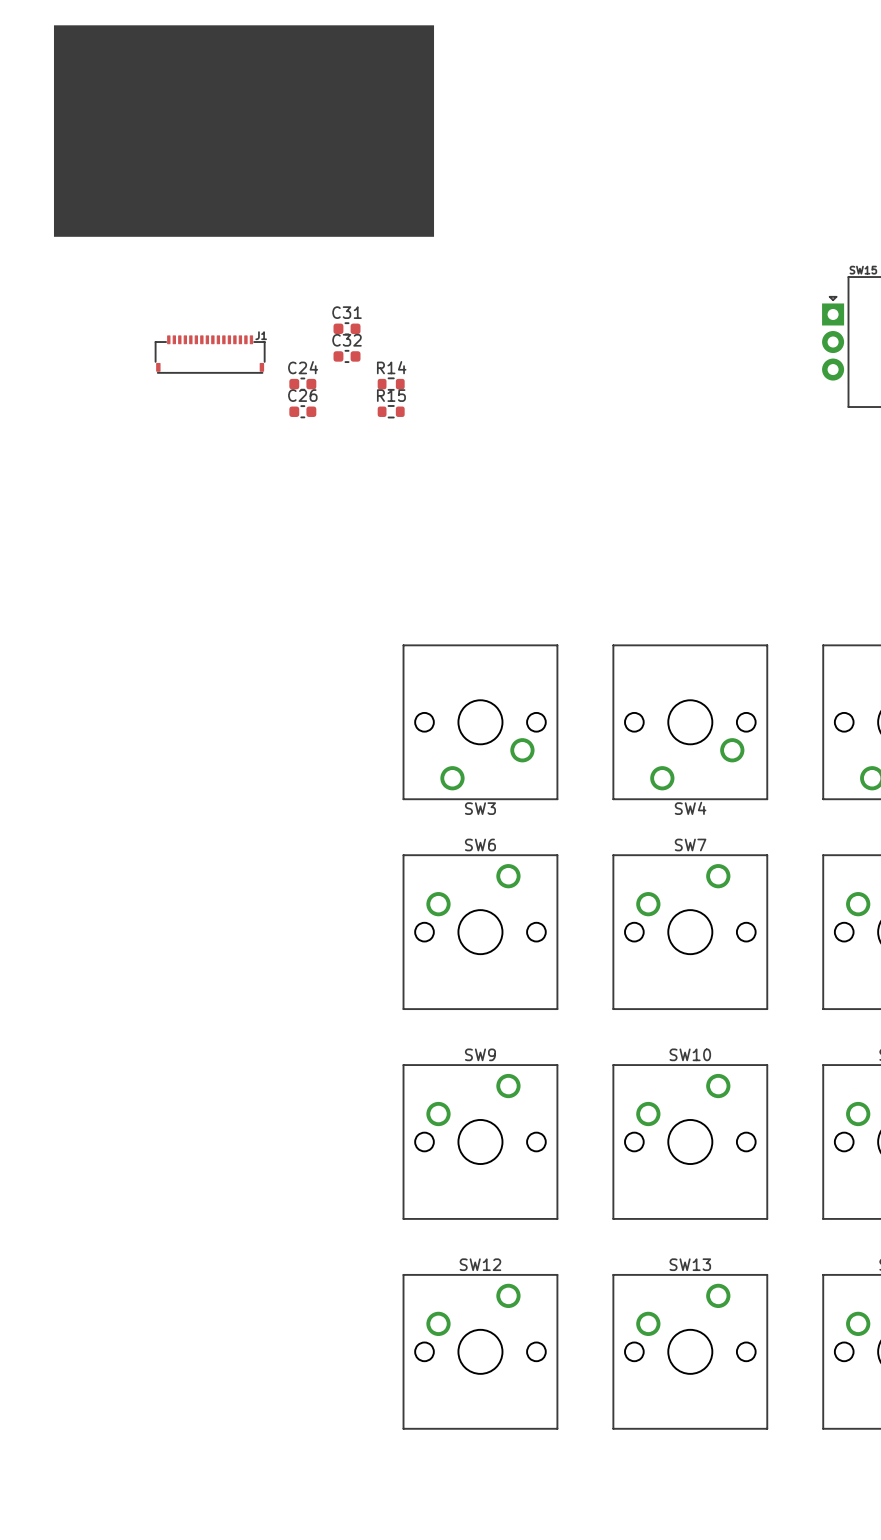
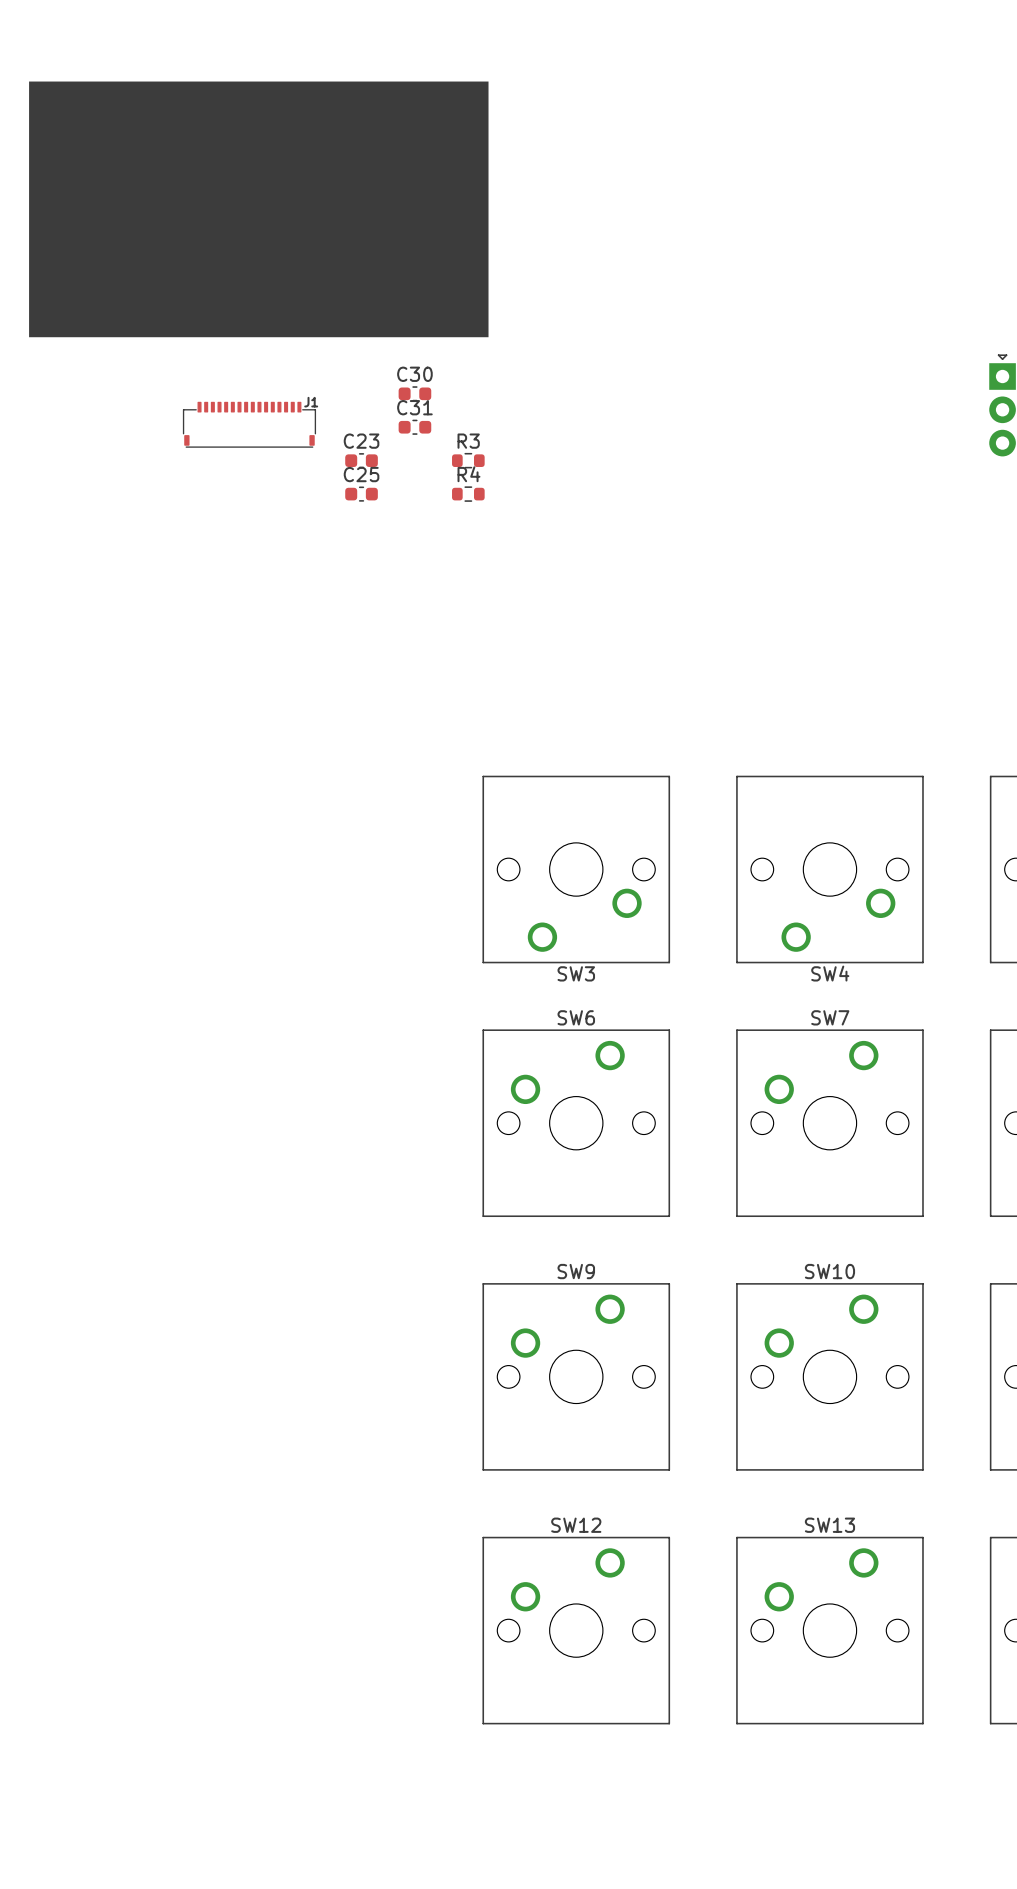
drawing position: (244, 131) -> (258, 209)
C31 name: C31 (347, 312) -> C30 (414, 374)
C32 name: C32 (347, 340) -> C31 (414, 407)
C24 name: C24 (303, 367) -> C23 (361, 441)
R14 name: R14 (391, 367) -> R3 (468, 441)
C26 name: C26 (302, 395) -> C25 (361, 474)
R15 name: R15 (391, 395) -> R4 (468, 474)

